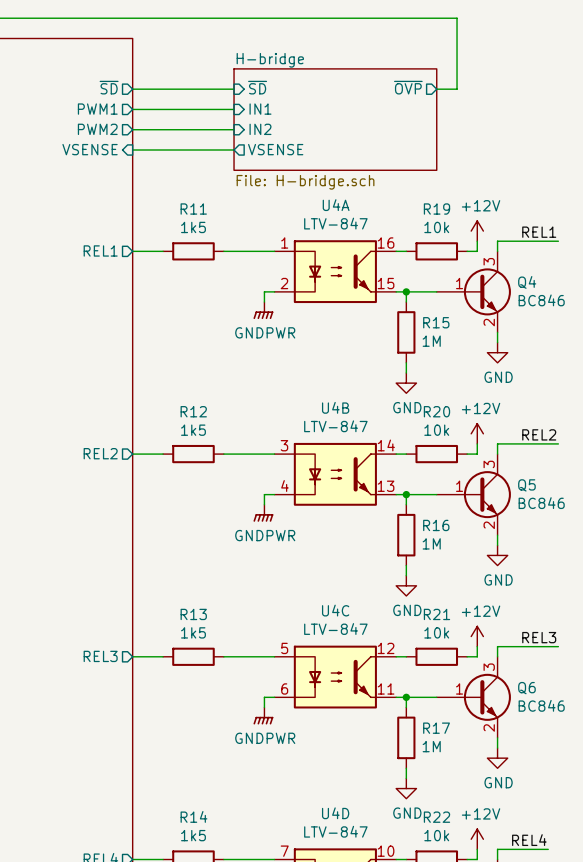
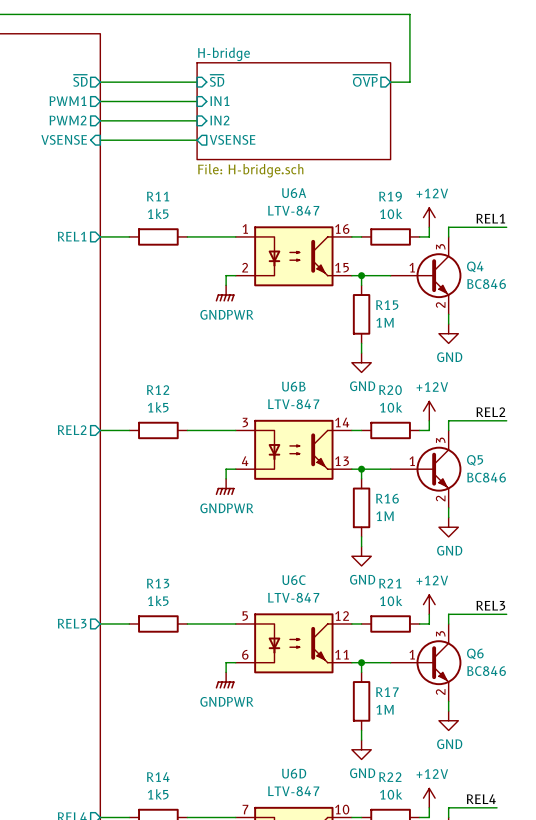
U4A name: U4A (336, 205) -> U6A (294, 193)
U4B name: U4B (335, 407) -> U6B (293, 386)
U4C name: U4C (335, 610) -> U6C (294, 580)
U4D name: U4D (335, 813) -> U6D (294, 773)

